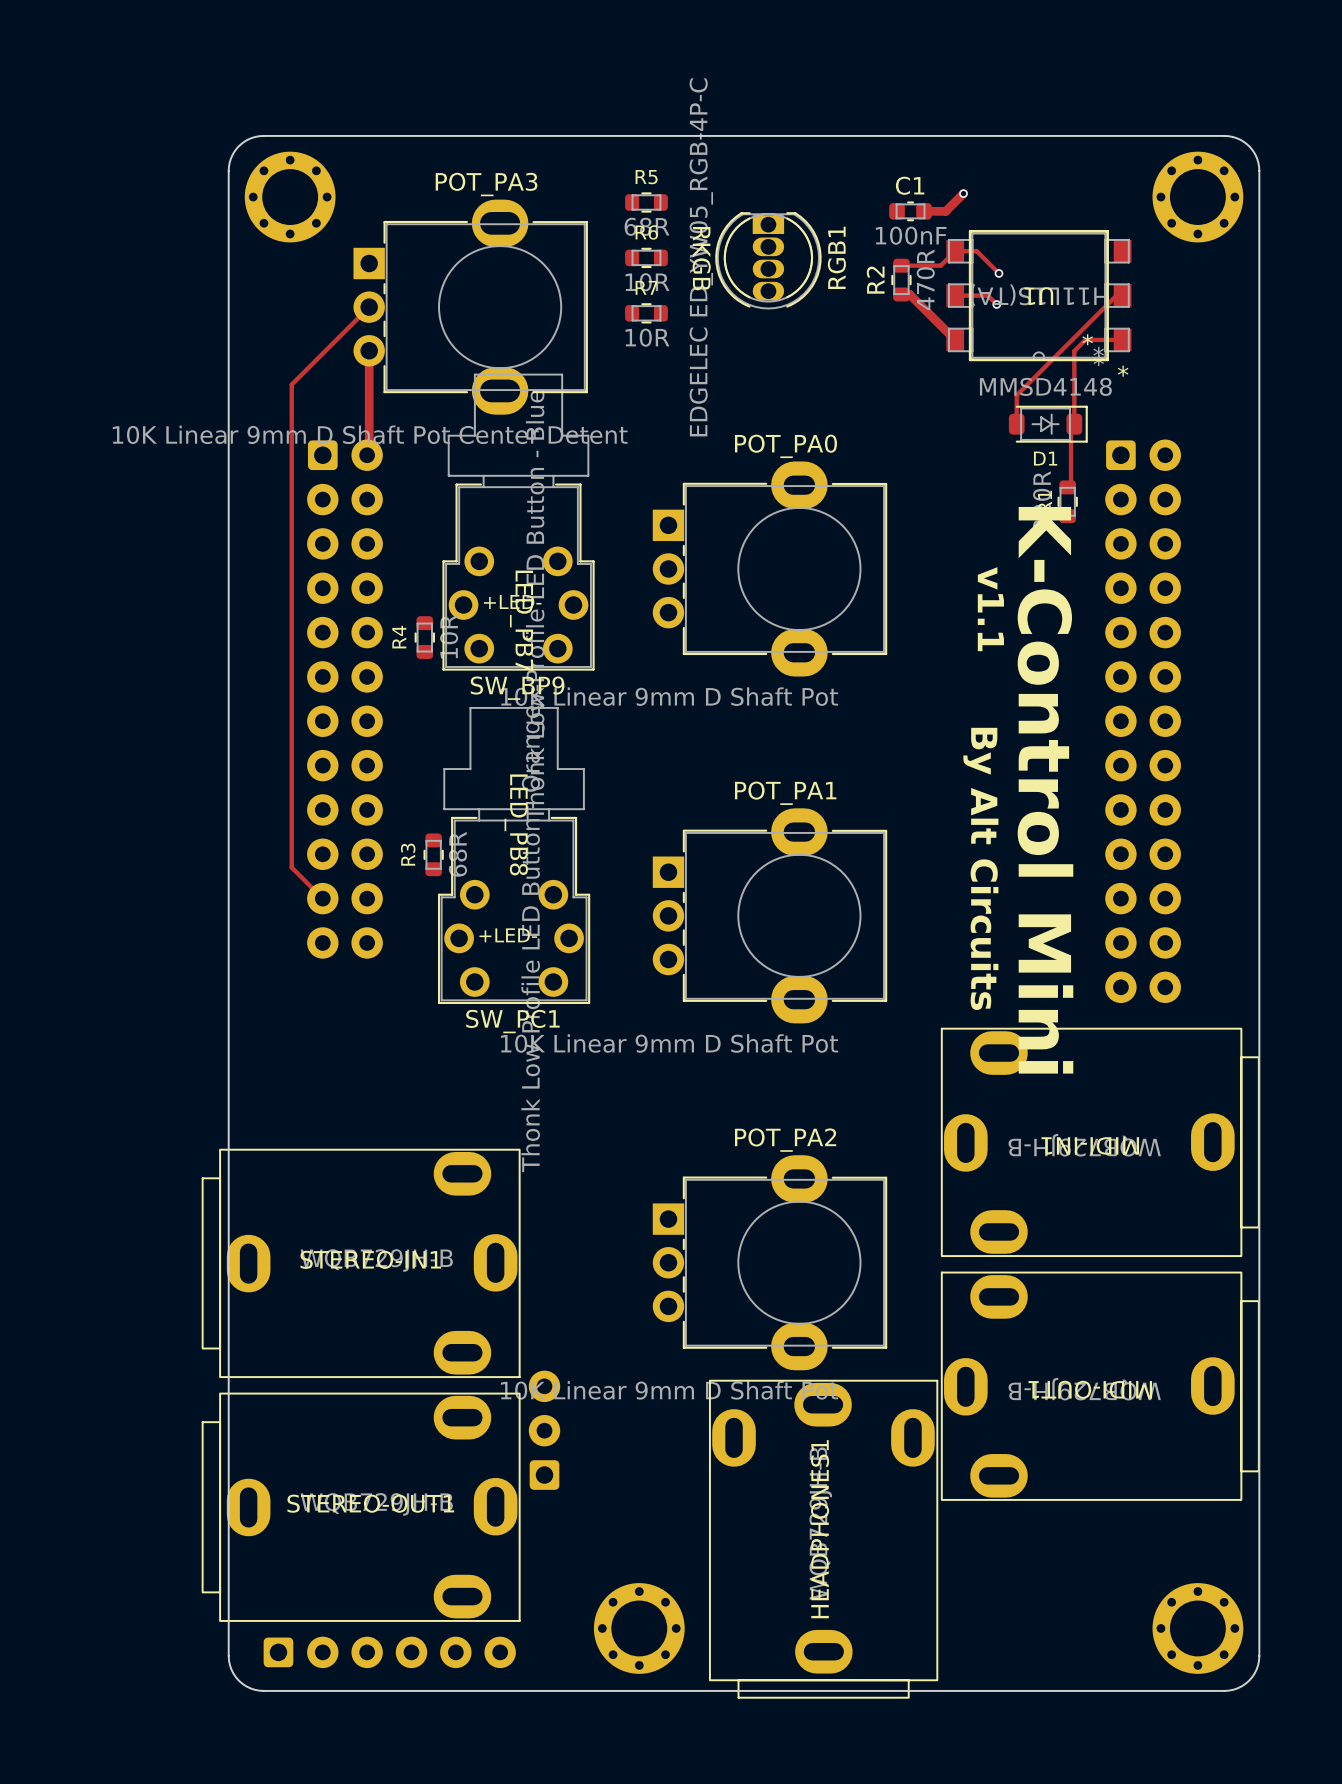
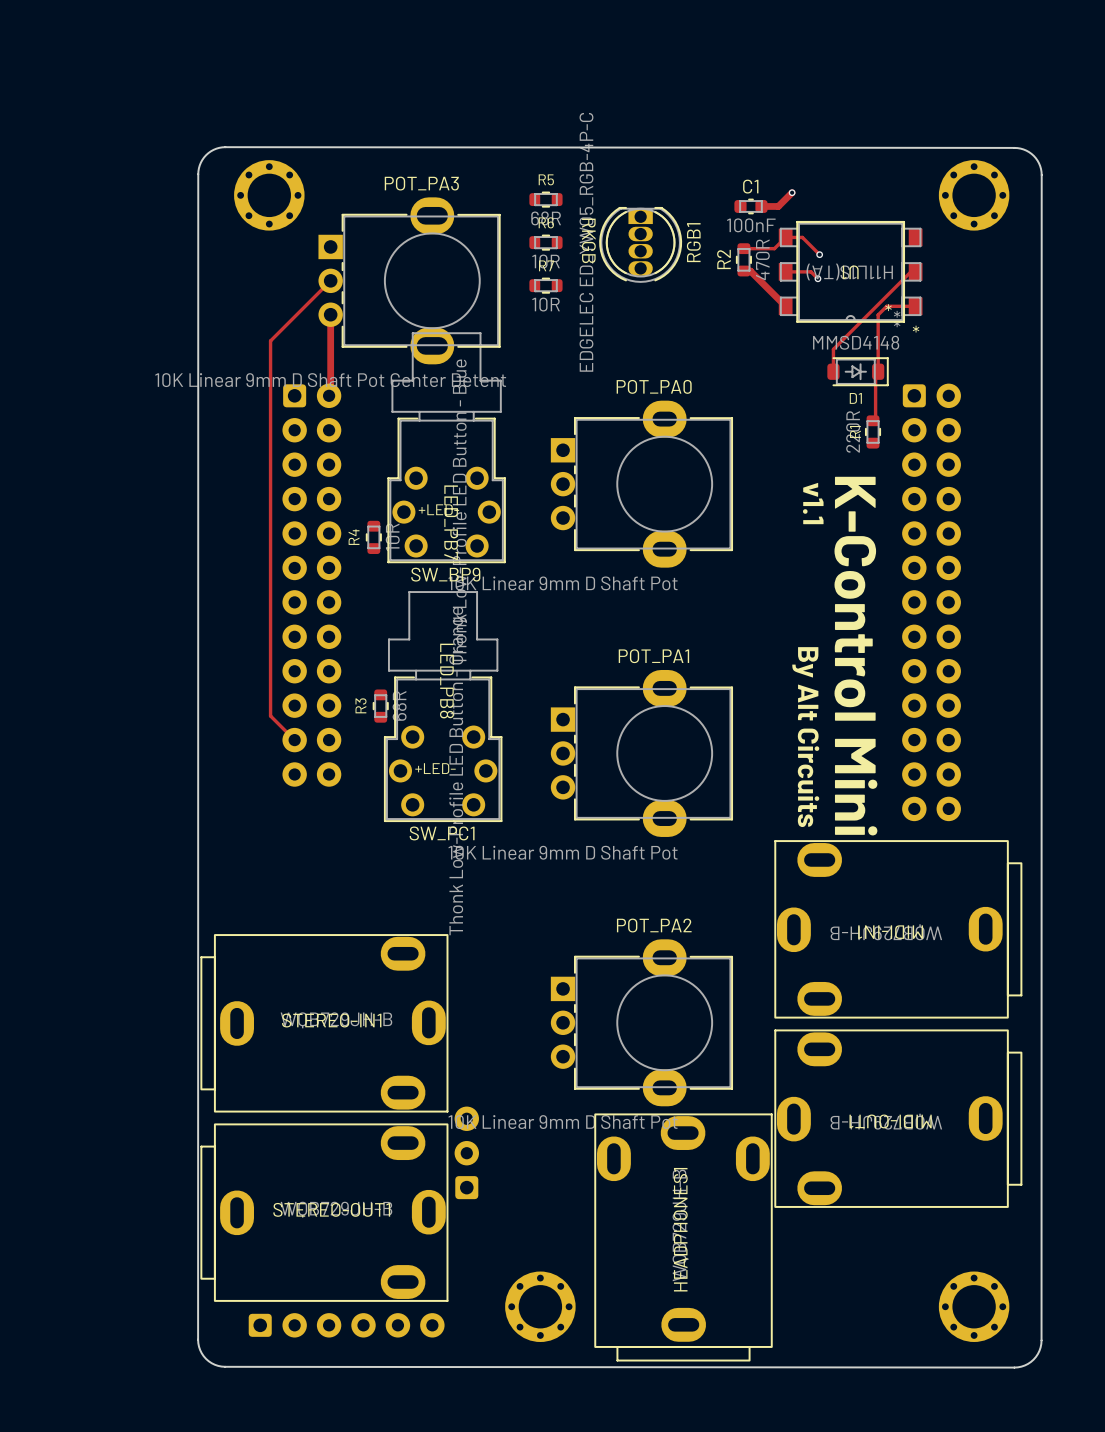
board edge: (263, 135) (1224, 135) (1243, 141) (1253, 152) (1259, 170) (1259, 1656) (1254, 1673) (1241, 1686) (1224, 1690) (263, 1690) (246, 1686) (233, 1673) (228, 1656) (228, 170) (230, 159) (238, 146) (248, 139) (263, 135) -> (225, 147) (213, 149) (206, 155) (200, 162) (198, 174) (198, 1339) (201, 1353) (211, 1363) (225, 1366) (1014, 1367) (1027, 1363) (1037, 1354) (1041, 1340) (1041, 175) (1037, 160) (1029, 152) (1014, 147) (225, 147)

